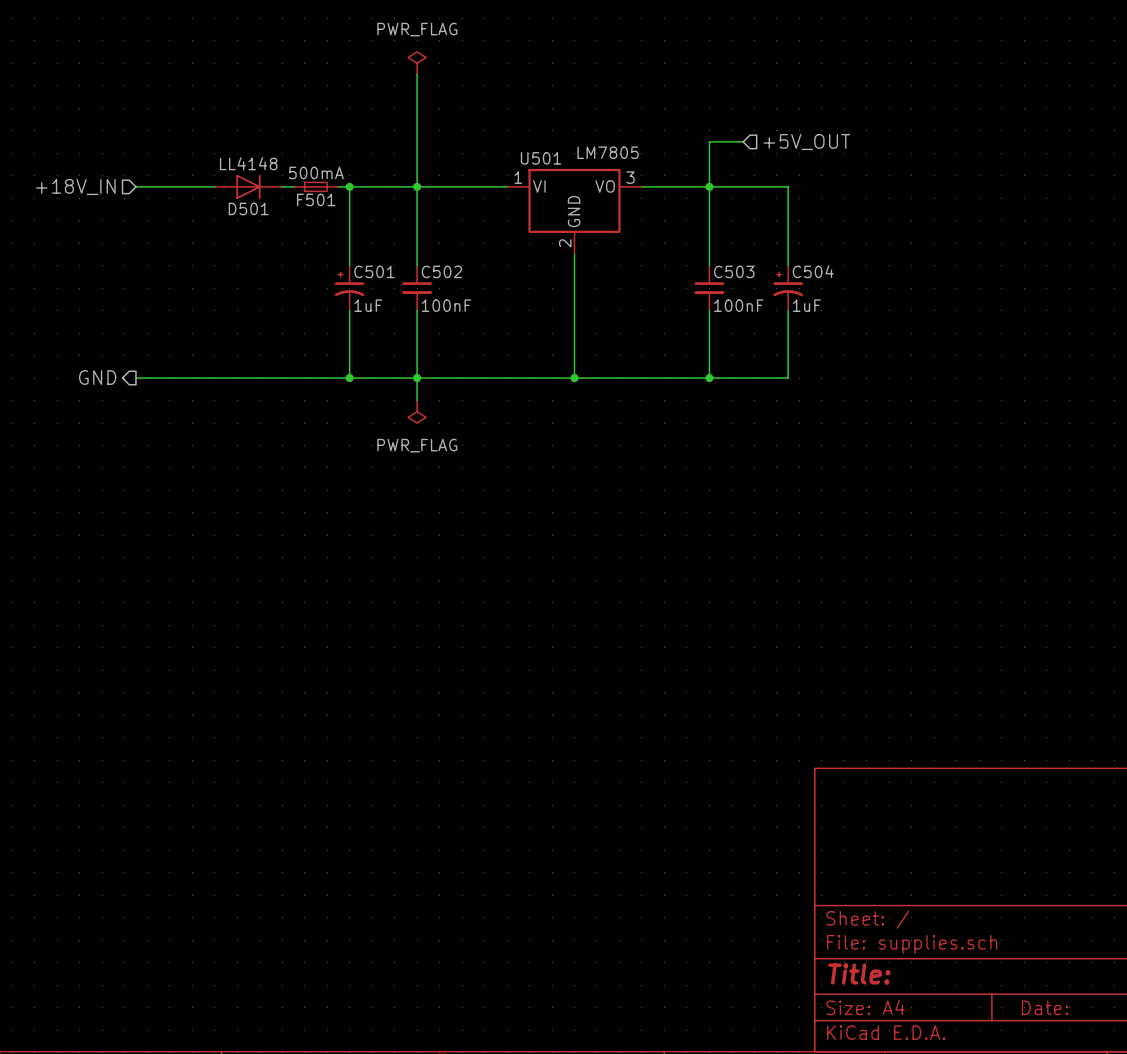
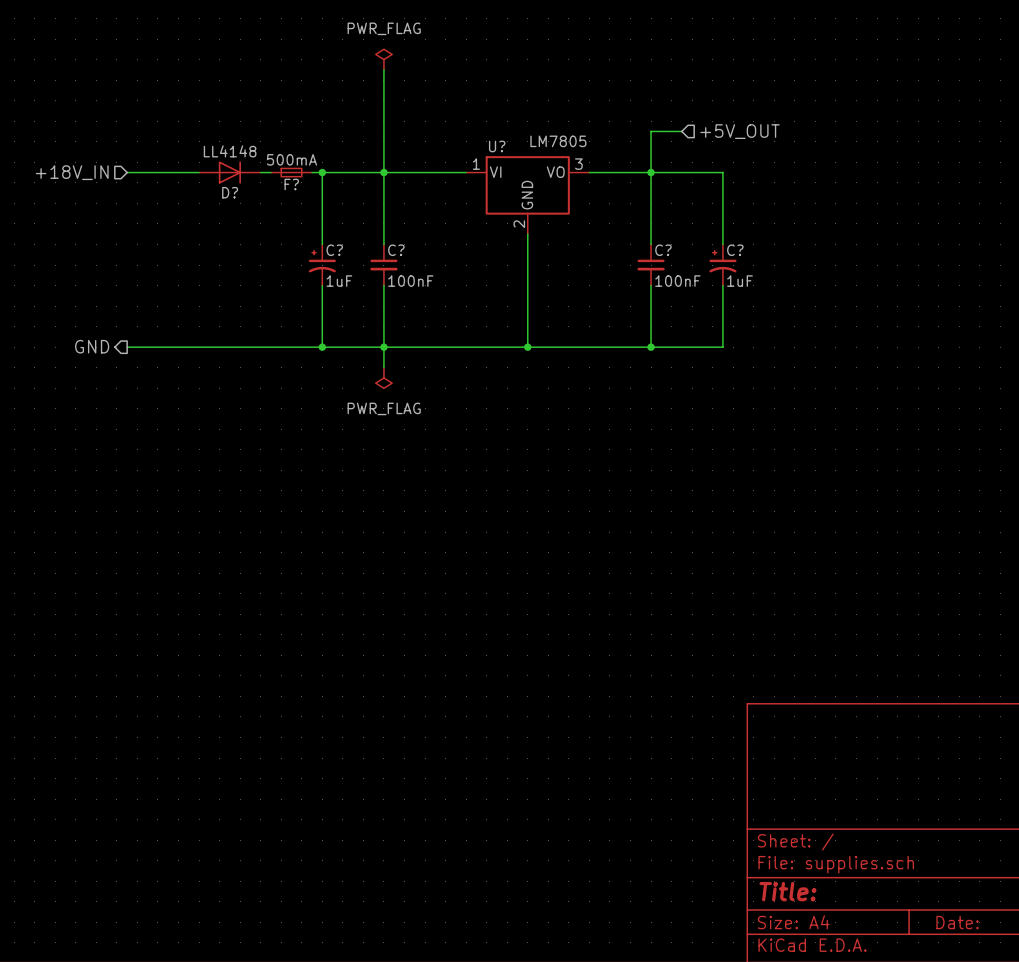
U501 name: U501 (541, 158) -> U? (497, 146)
F501 name: F501 (316, 199) -> F? (291, 184)
D501 name: D501 (248, 208) -> D? (230, 192)
C501 name: C501 (374, 271) -> C? (334, 250)
C502 name: C502 (441, 271) -> C? (396, 250)
C503 name: C503 (734, 271) -> C? (663, 250)
C504 name: C504 (813, 271) -> C? (735, 250)

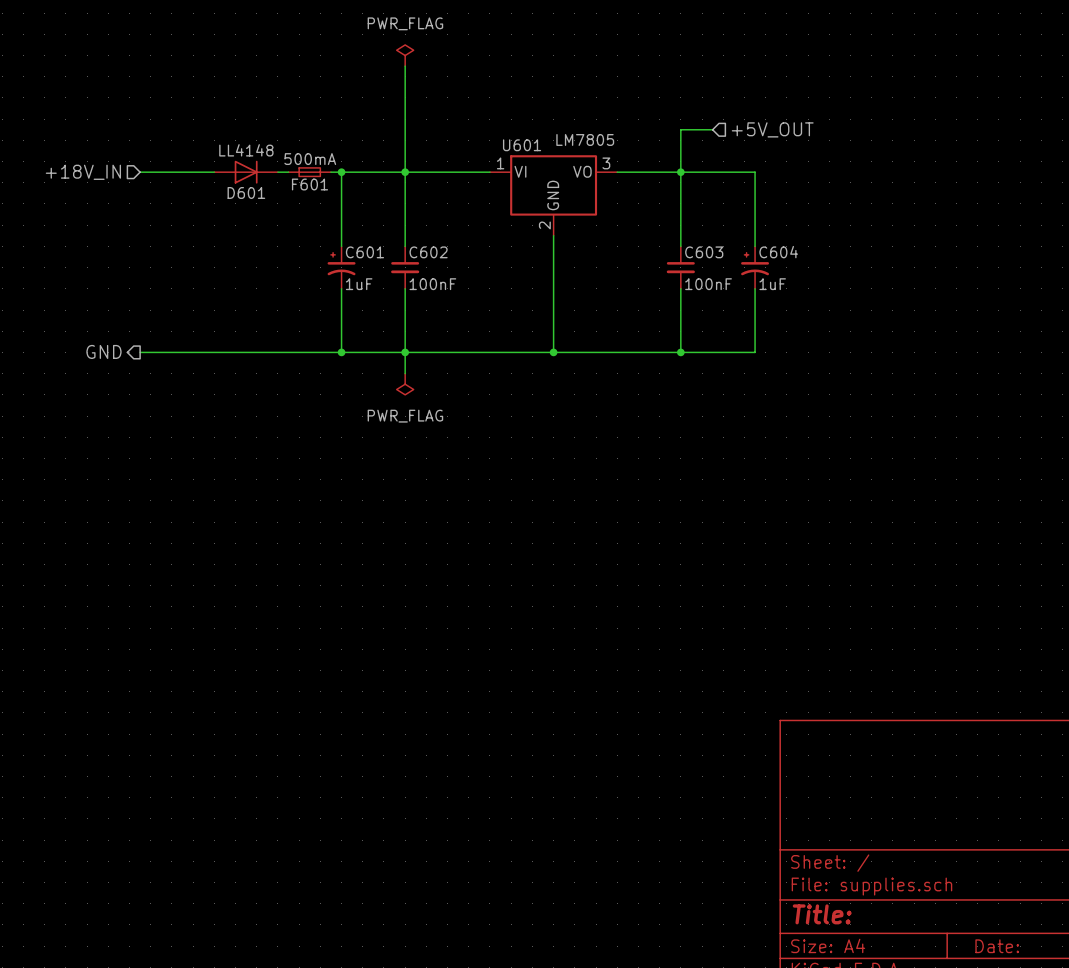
U? name: U? (497, 146) -> U601 (522, 145)
F? name: F? (291, 184) -> F601 (309, 184)
D? name: D? (230, 192) -> D601 (246, 192)
C? name: C? (334, 250) -> C601 (364, 252)
C? name: C? (396, 250) -> C602 (428, 252)
C? name: C? (663, 250) -> C603 (704, 252)
C? name: C? (735, 250) -> C604 (778, 252)

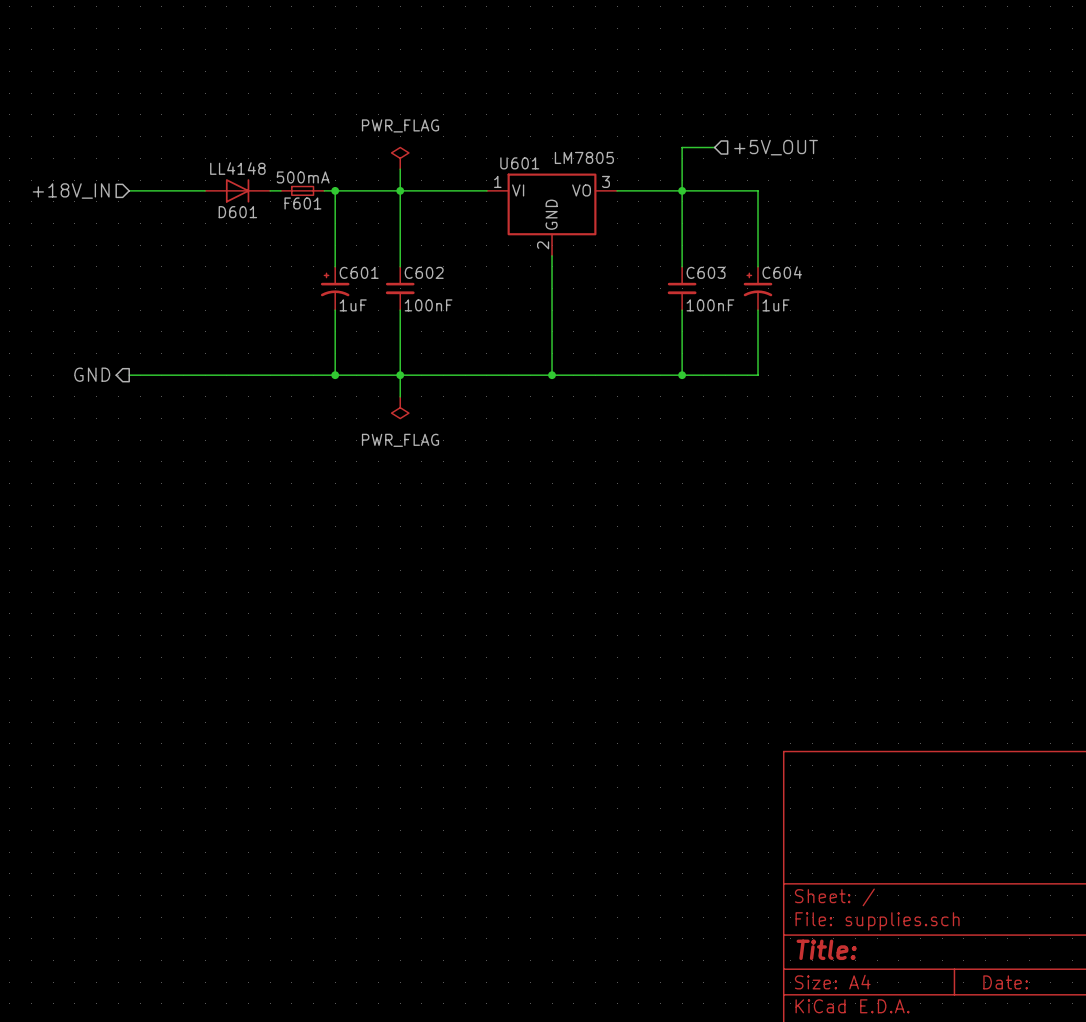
power symbol position: PWR_FLAG (405, 55) -> PWR_FLAG (400, 158)
wire: (405, 66) (405, 150) -> none

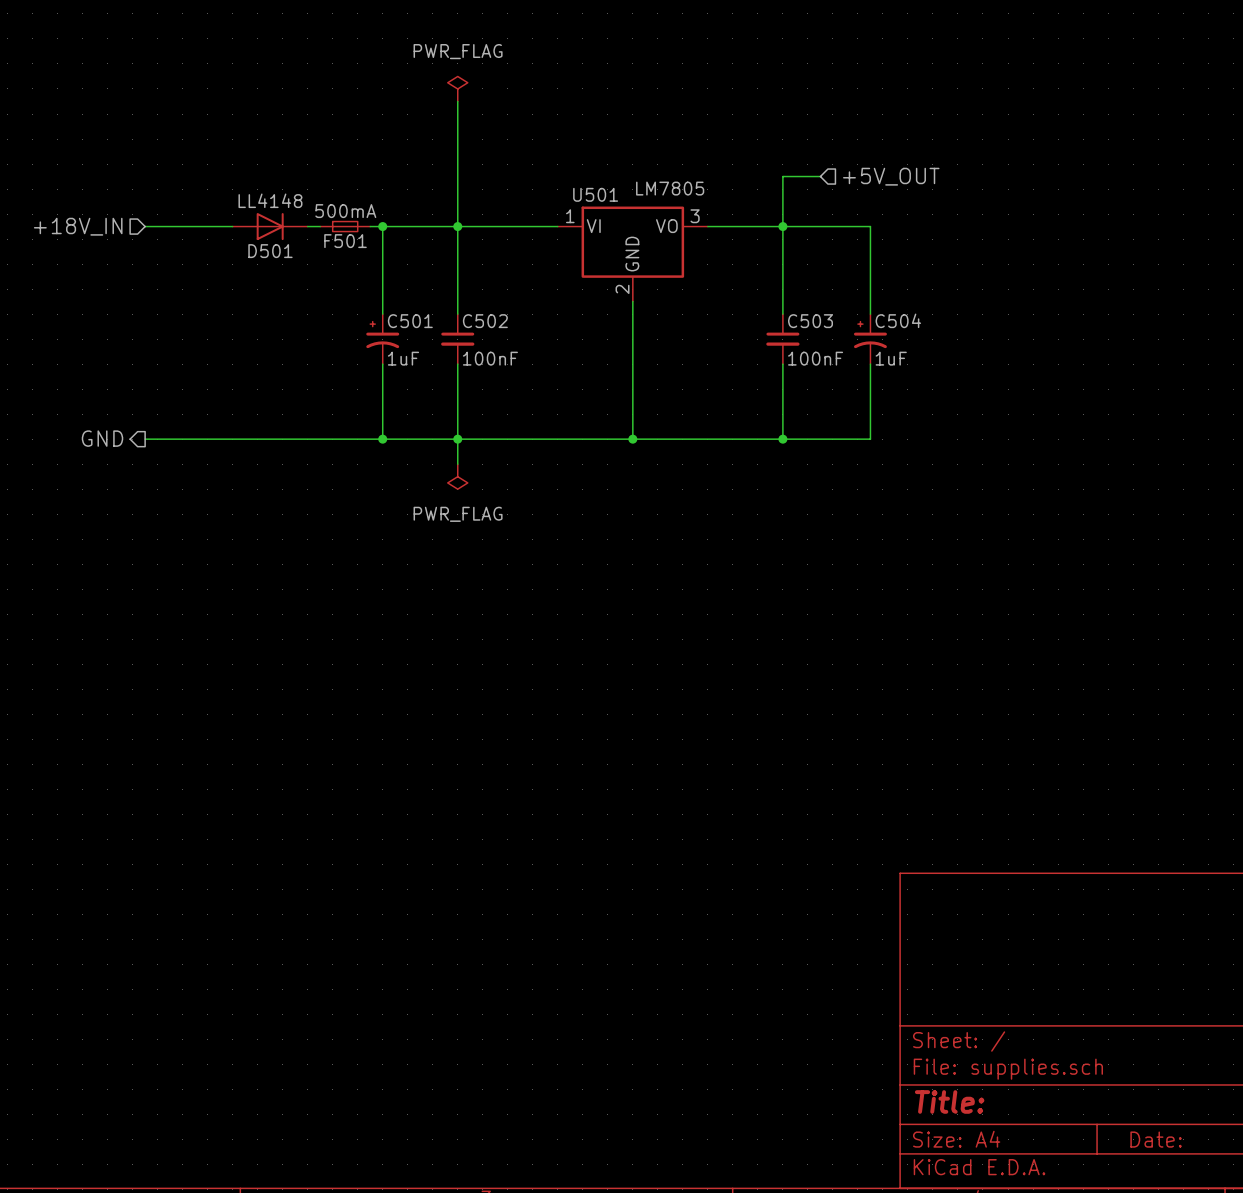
wire: none -> (457, 101) (457, 201)
power symbol position: PWR_FLAG (400, 158) -> PWR_FLAG (457, 88)
U601 name: U601 (519, 163) -> U501 (595, 194)
F601 name: F601 (302, 203) -> F501 (345, 241)
D601 name: D601 (237, 212) -> D501 (270, 251)
C601 name: C601 (359, 272) -> C501 (410, 321)
C602 name: C602 (424, 272) -> C502 (485, 321)
C603 name: C603 (706, 272) -> C503 (810, 321)
C604 name: C604 (782, 272) -> C504 (898, 320)

